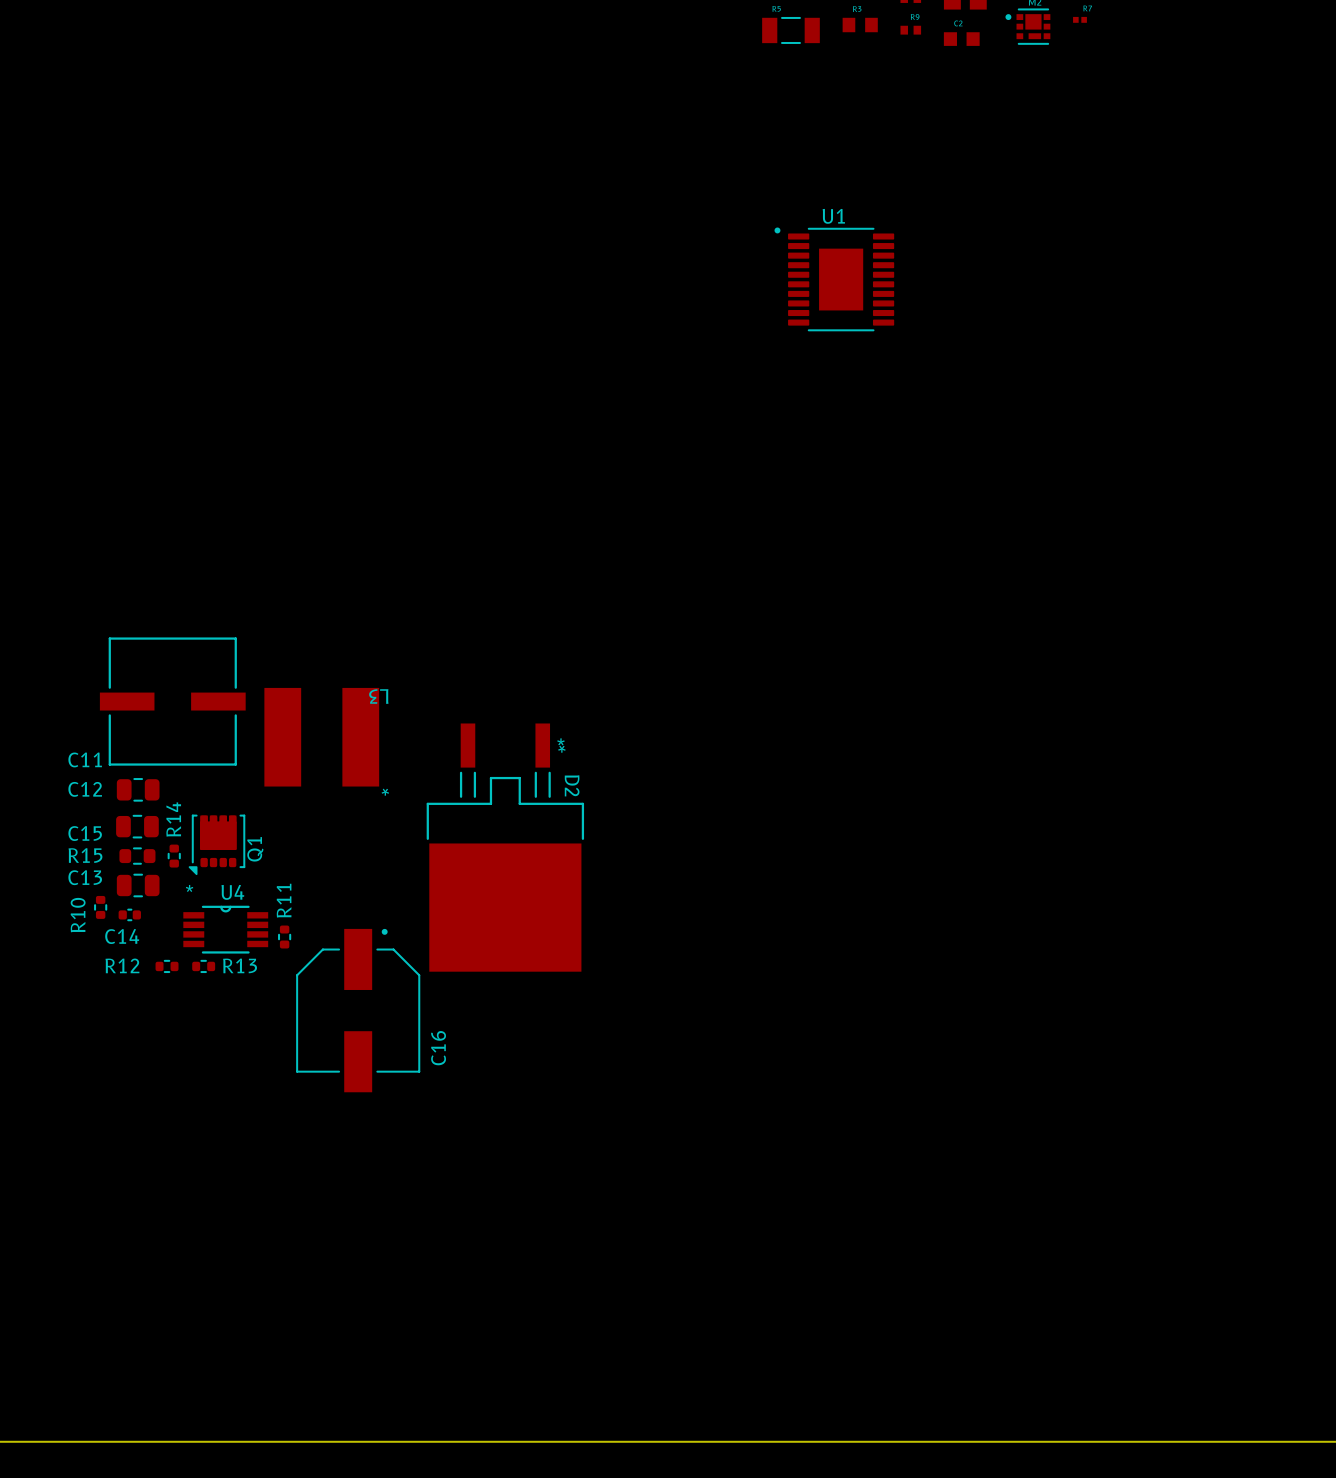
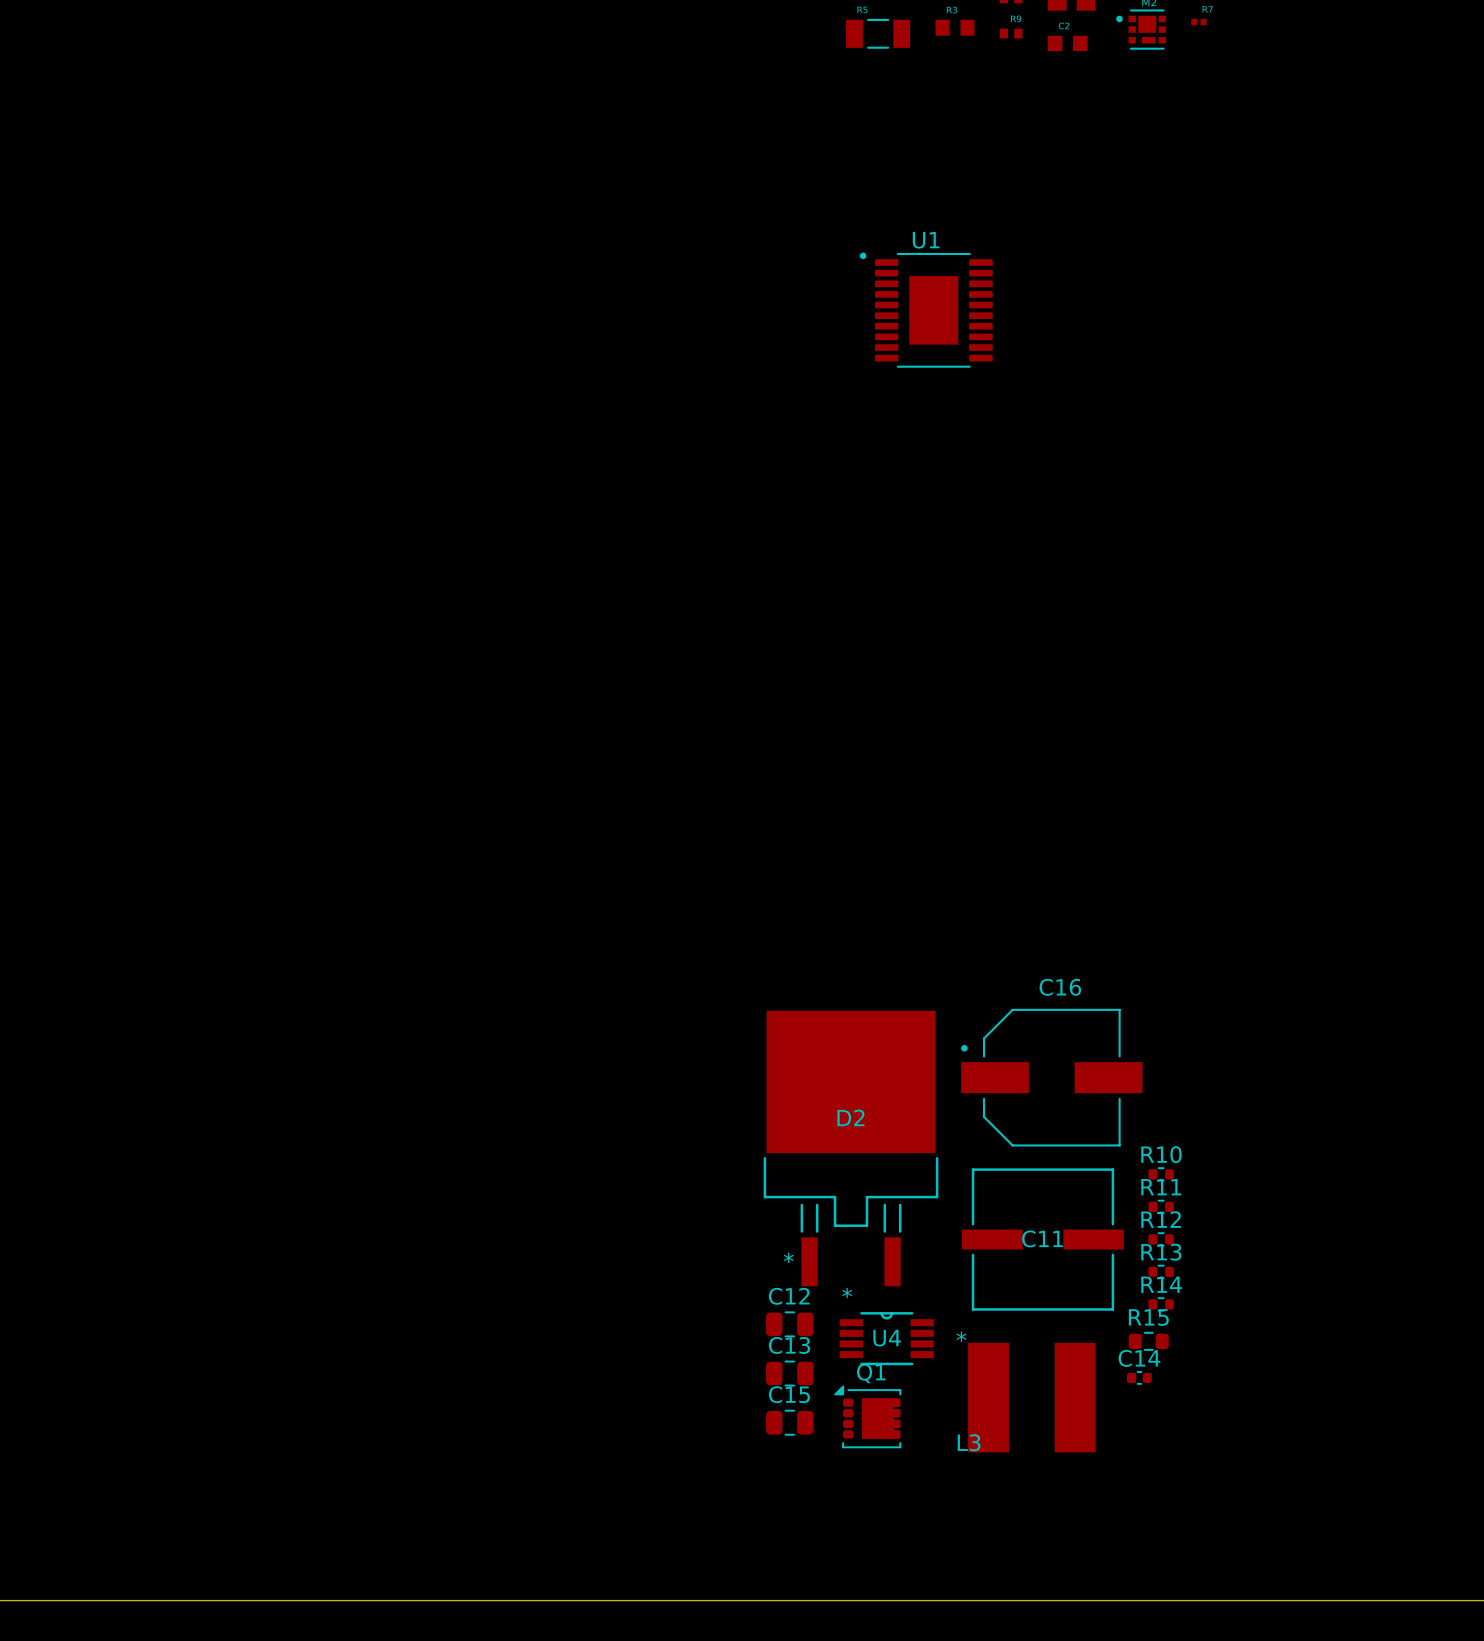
C11 position: (172, 701) -> (1042, 1239)
L3 rotation: 0° (321, 737) -> 180° (1031, 1397)
L3 position: (321, 737) -> (1031, 1397)
C11 name position: C11 (85, 759) -> C11 (1042, 1238)
D2 name position: D2 (572, 785) -> D2 (850, 1117)
C12 name position: C12 (85, 789) -> C12 (789, 1296)
C12 position: (138, 789) -> (789, 1324)
C15 position: (137, 826) -> (789, 1422)
C15 name position: C15 (85, 833) -> C15 (789, 1394)
Q1 rotation: 0° (216, 844) -> 90° clockwise (867, 1416)
Q1 position: (216, 844) -> (867, 1416)
D2 rotation: 0° (505, 847) -> 180° (851, 1148)
D2 position: (505, 847) -> (851, 1148)
Q1 name position: Q1 (255, 849) -> Q1 (871, 1373)
R15 name position: R15 (85, 855) -> R15 (1148, 1317)
R15 position: (137, 856) -> (1148, 1341)
R14 rotation: 0° (174, 856) -> 90° clockwise (1161, 1304)
R14 position: (174, 856) -> (1161, 1304)
C13 name position: C13 (85, 877) -> C13 (789, 1345)
C13 position: (138, 885) -> (789, 1373)
U4 name position: U4 (232, 892) -> U4 (887, 1338)
R10 rotation: 0° (100, 907) -> 90° clockwise (1161, 1174)
R10 position: (100, 907) -> (1161, 1174)
C14 position: (129, 914) -> (1139, 1377)
U4 position: (225, 929) -> (886, 1338)
C14 name position: C14 (122, 936) -> C14 (1139, 1358)
R11 rotation: 0° (284, 937) -> 90° clockwise (1161, 1206)
R11 position: (284, 937) -> (1161, 1206)
R12 name position: R12 (122, 965) -> R12 (1161, 1219)
R13 name position: R13 (240, 965) -> R13 (1161, 1252)
R12 position: (167, 966) -> (1161, 1239)
R13 position: (203, 966) -> (1161, 1271)
C16 rotation: 0° (358, 1010) -> 90° counterclockwise (1051, 1077)
C16 position: (358, 1010) -> (1051, 1077)
C16 name position: C16 (438, 1048) -> C16 (1060, 987)

